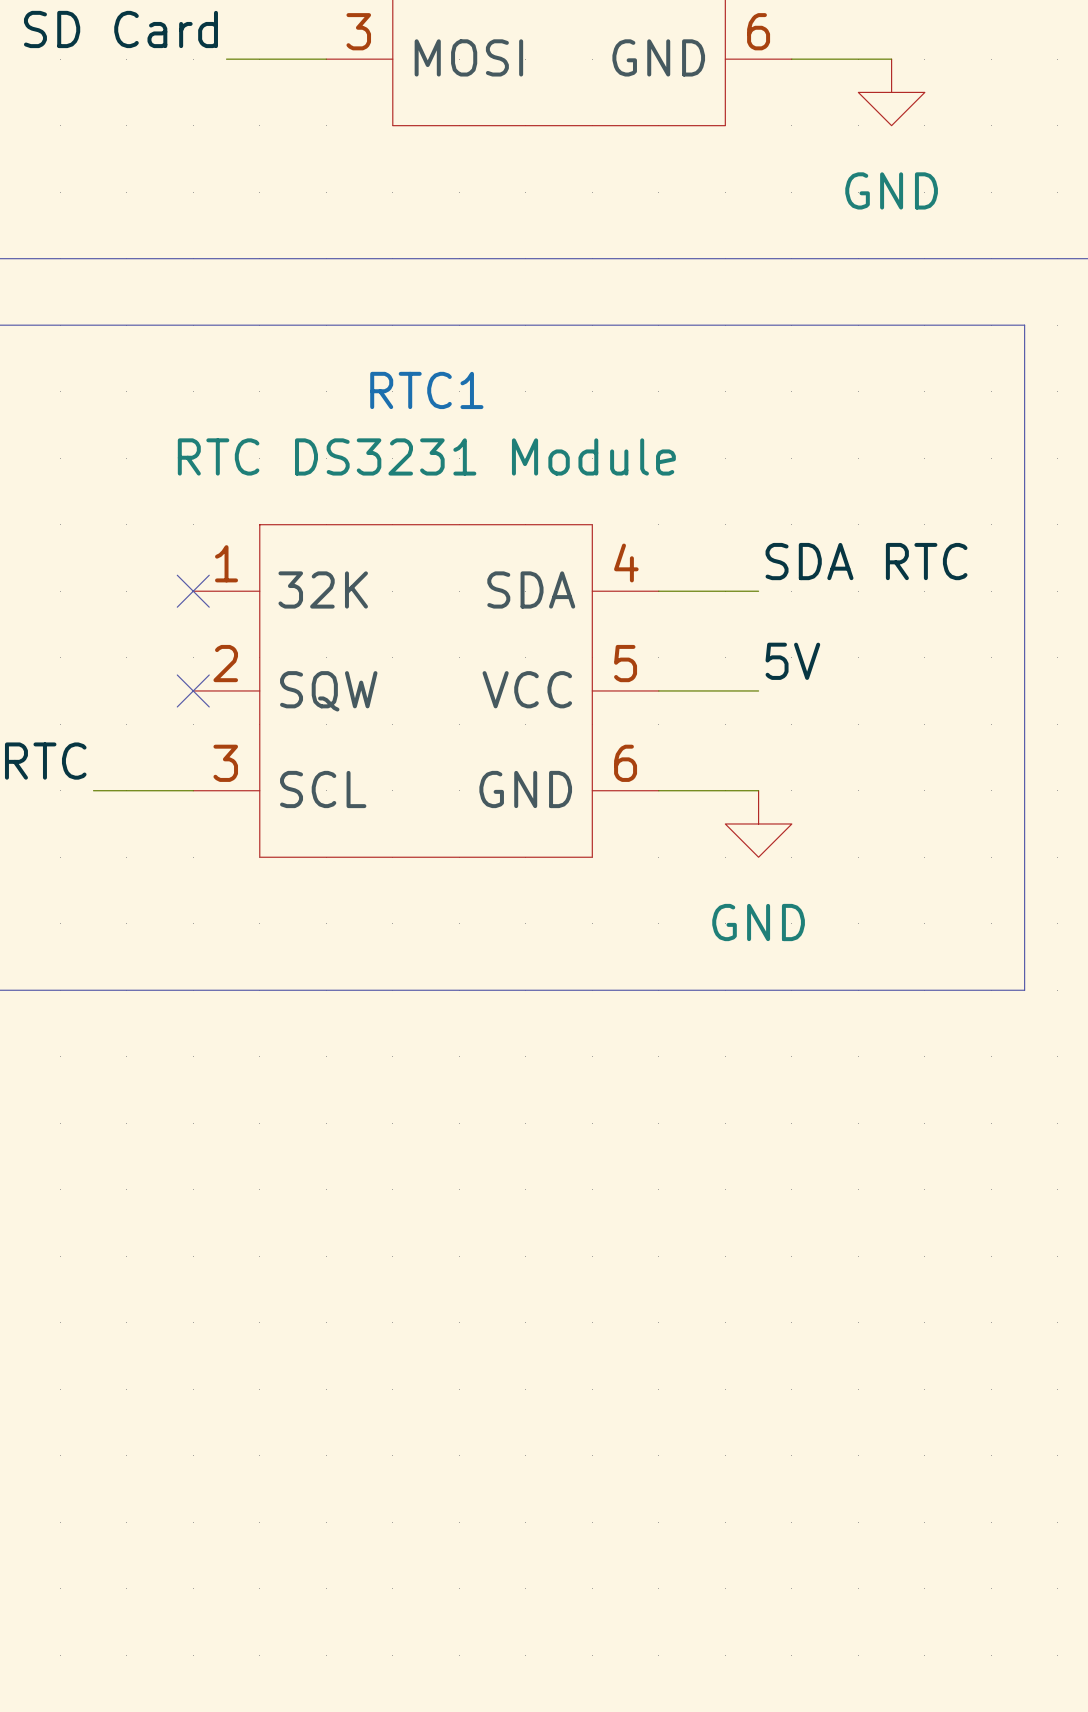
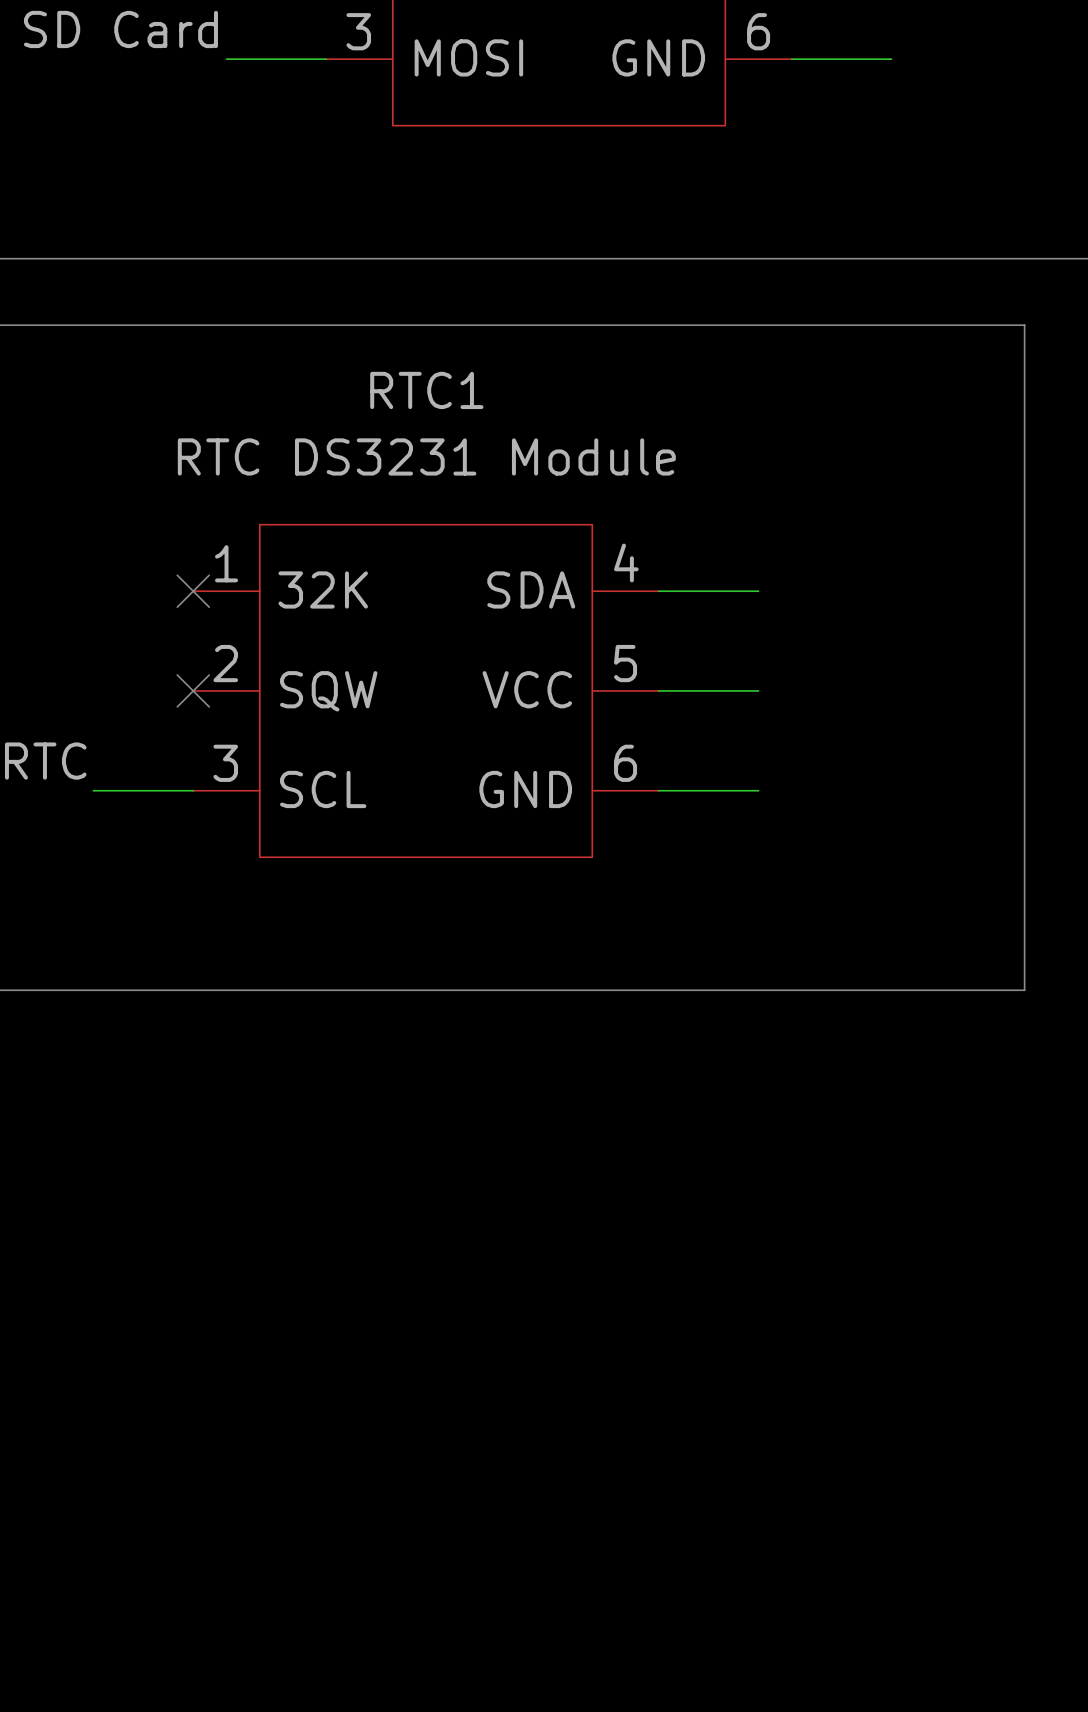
power symbol: GND (891, 92) -> none
label: SDA RTC (866, 561) -> none
label: 5V (792, 661) -> none
power symbol: GND (758, 823) -> none

